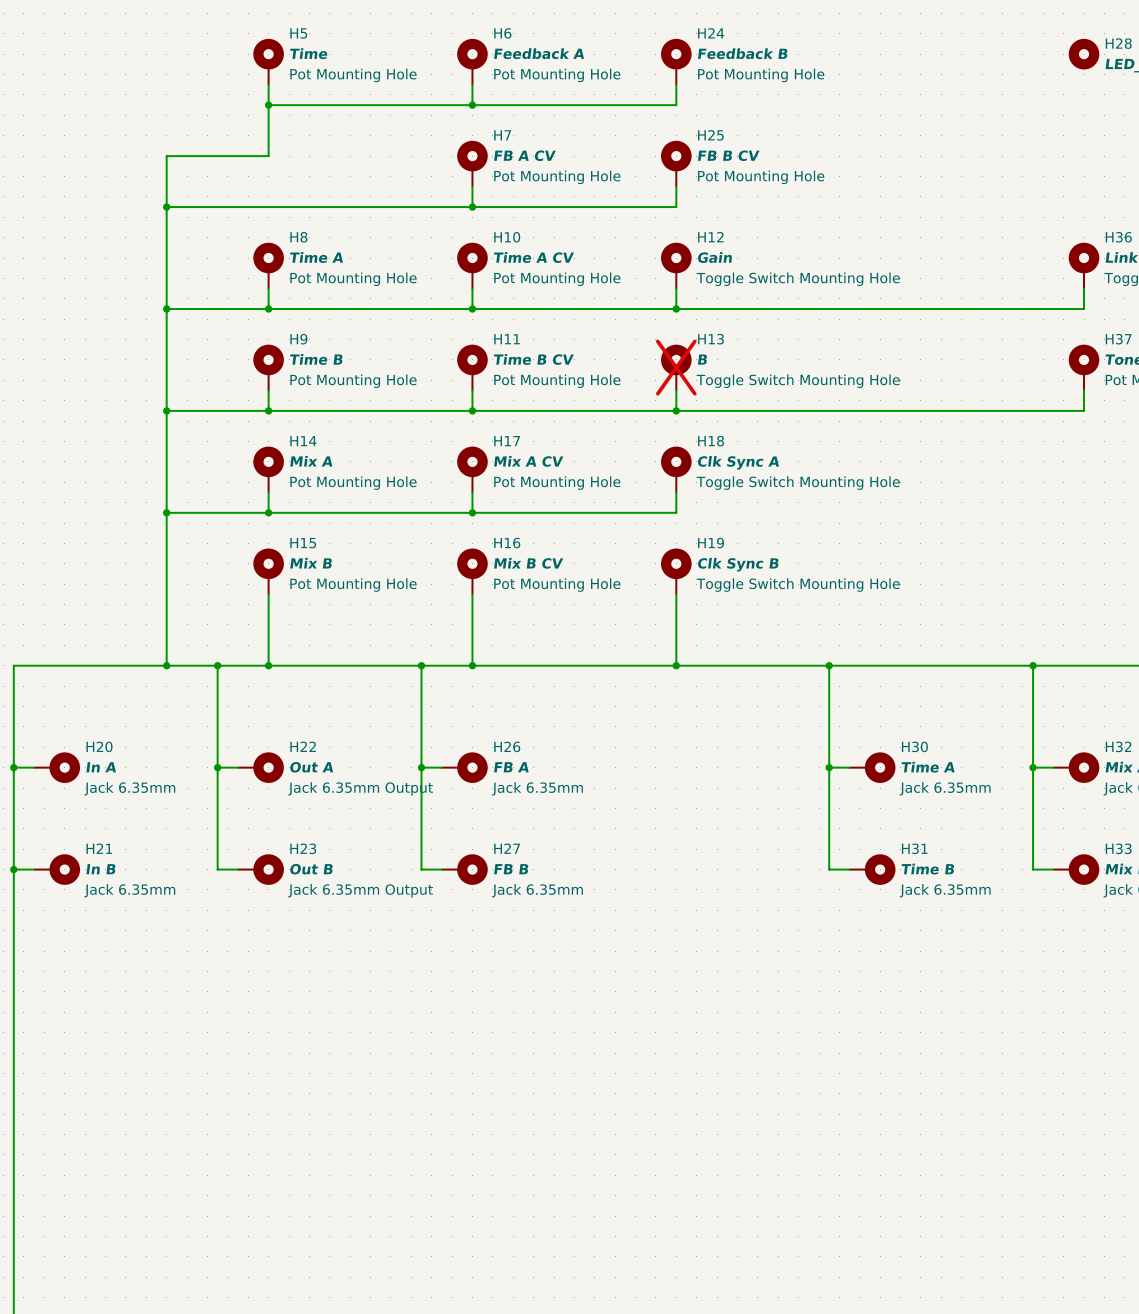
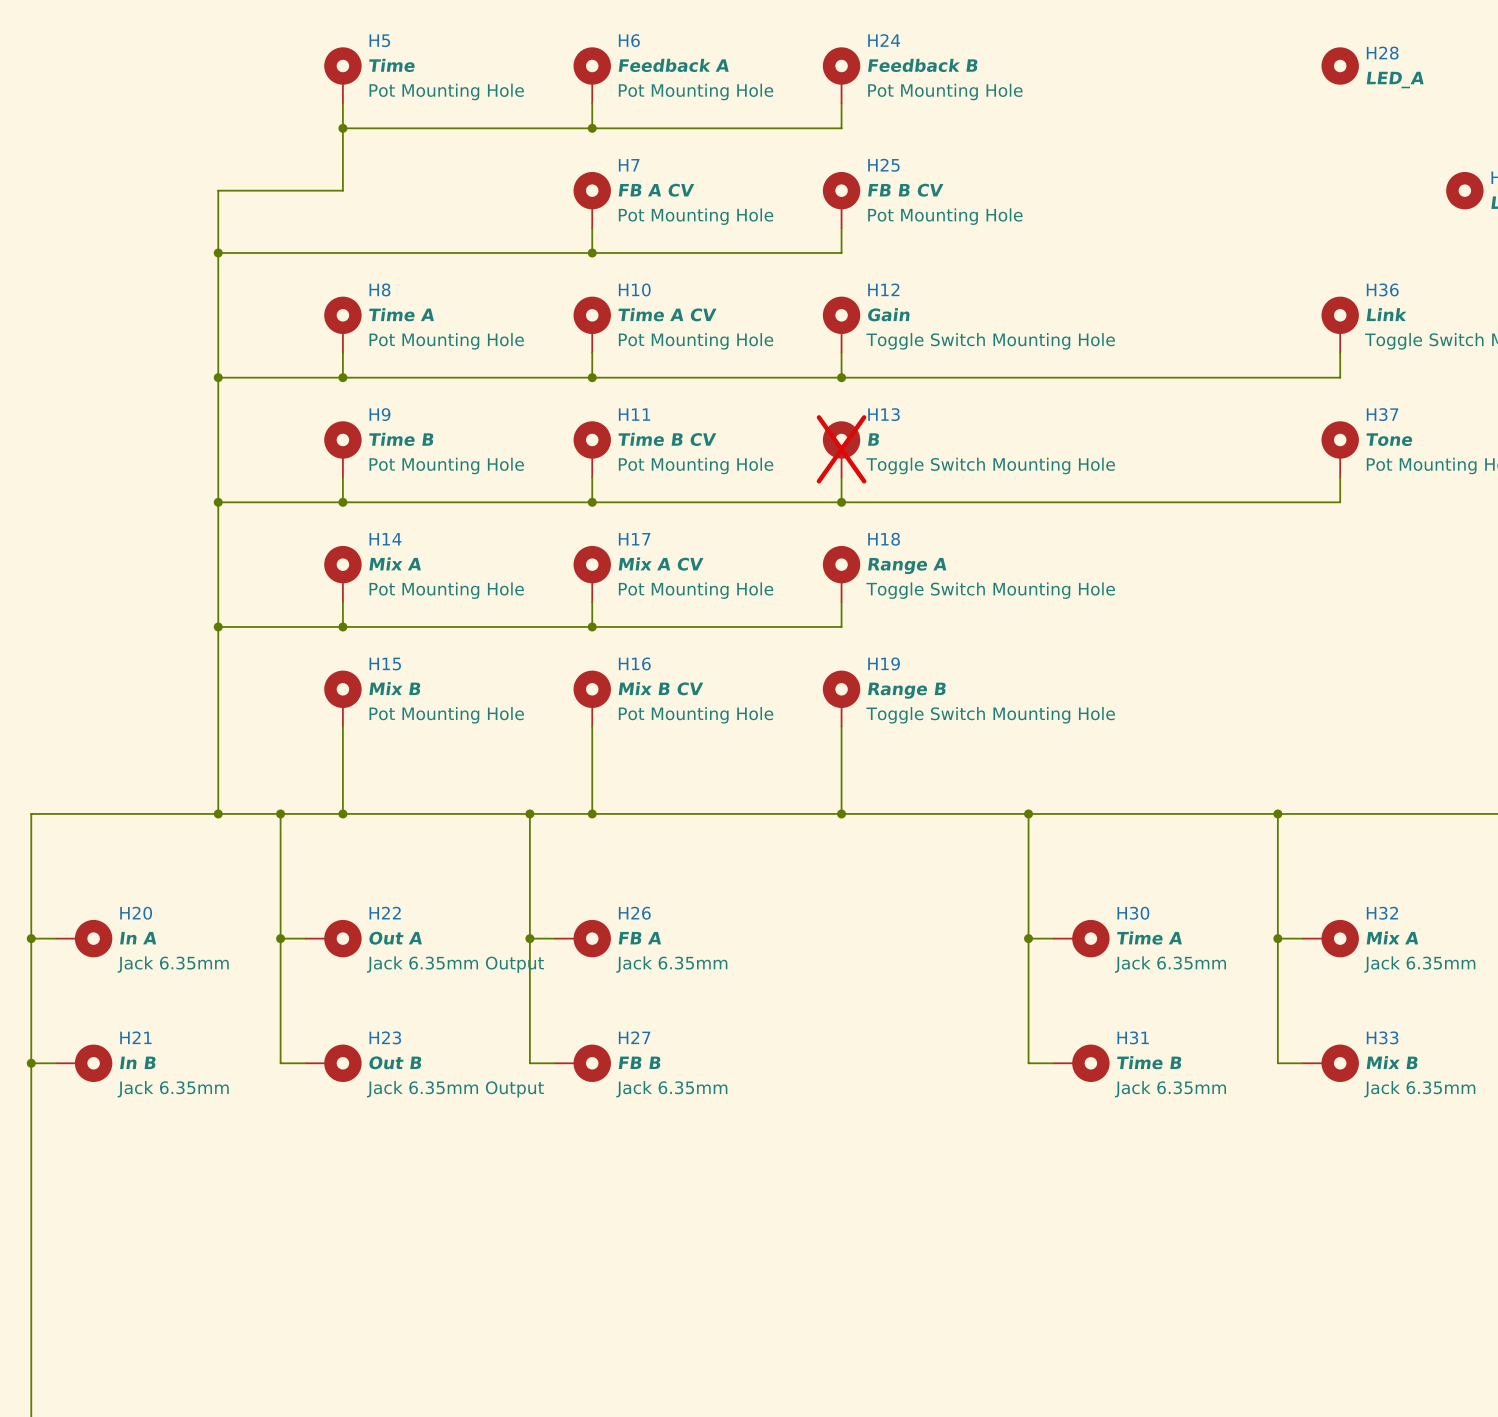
H18 value: Clk Sync A (738, 462) -> Range A (907, 566)
H19 value: Clk Sync B (738, 564) -> Range B (906, 690)

